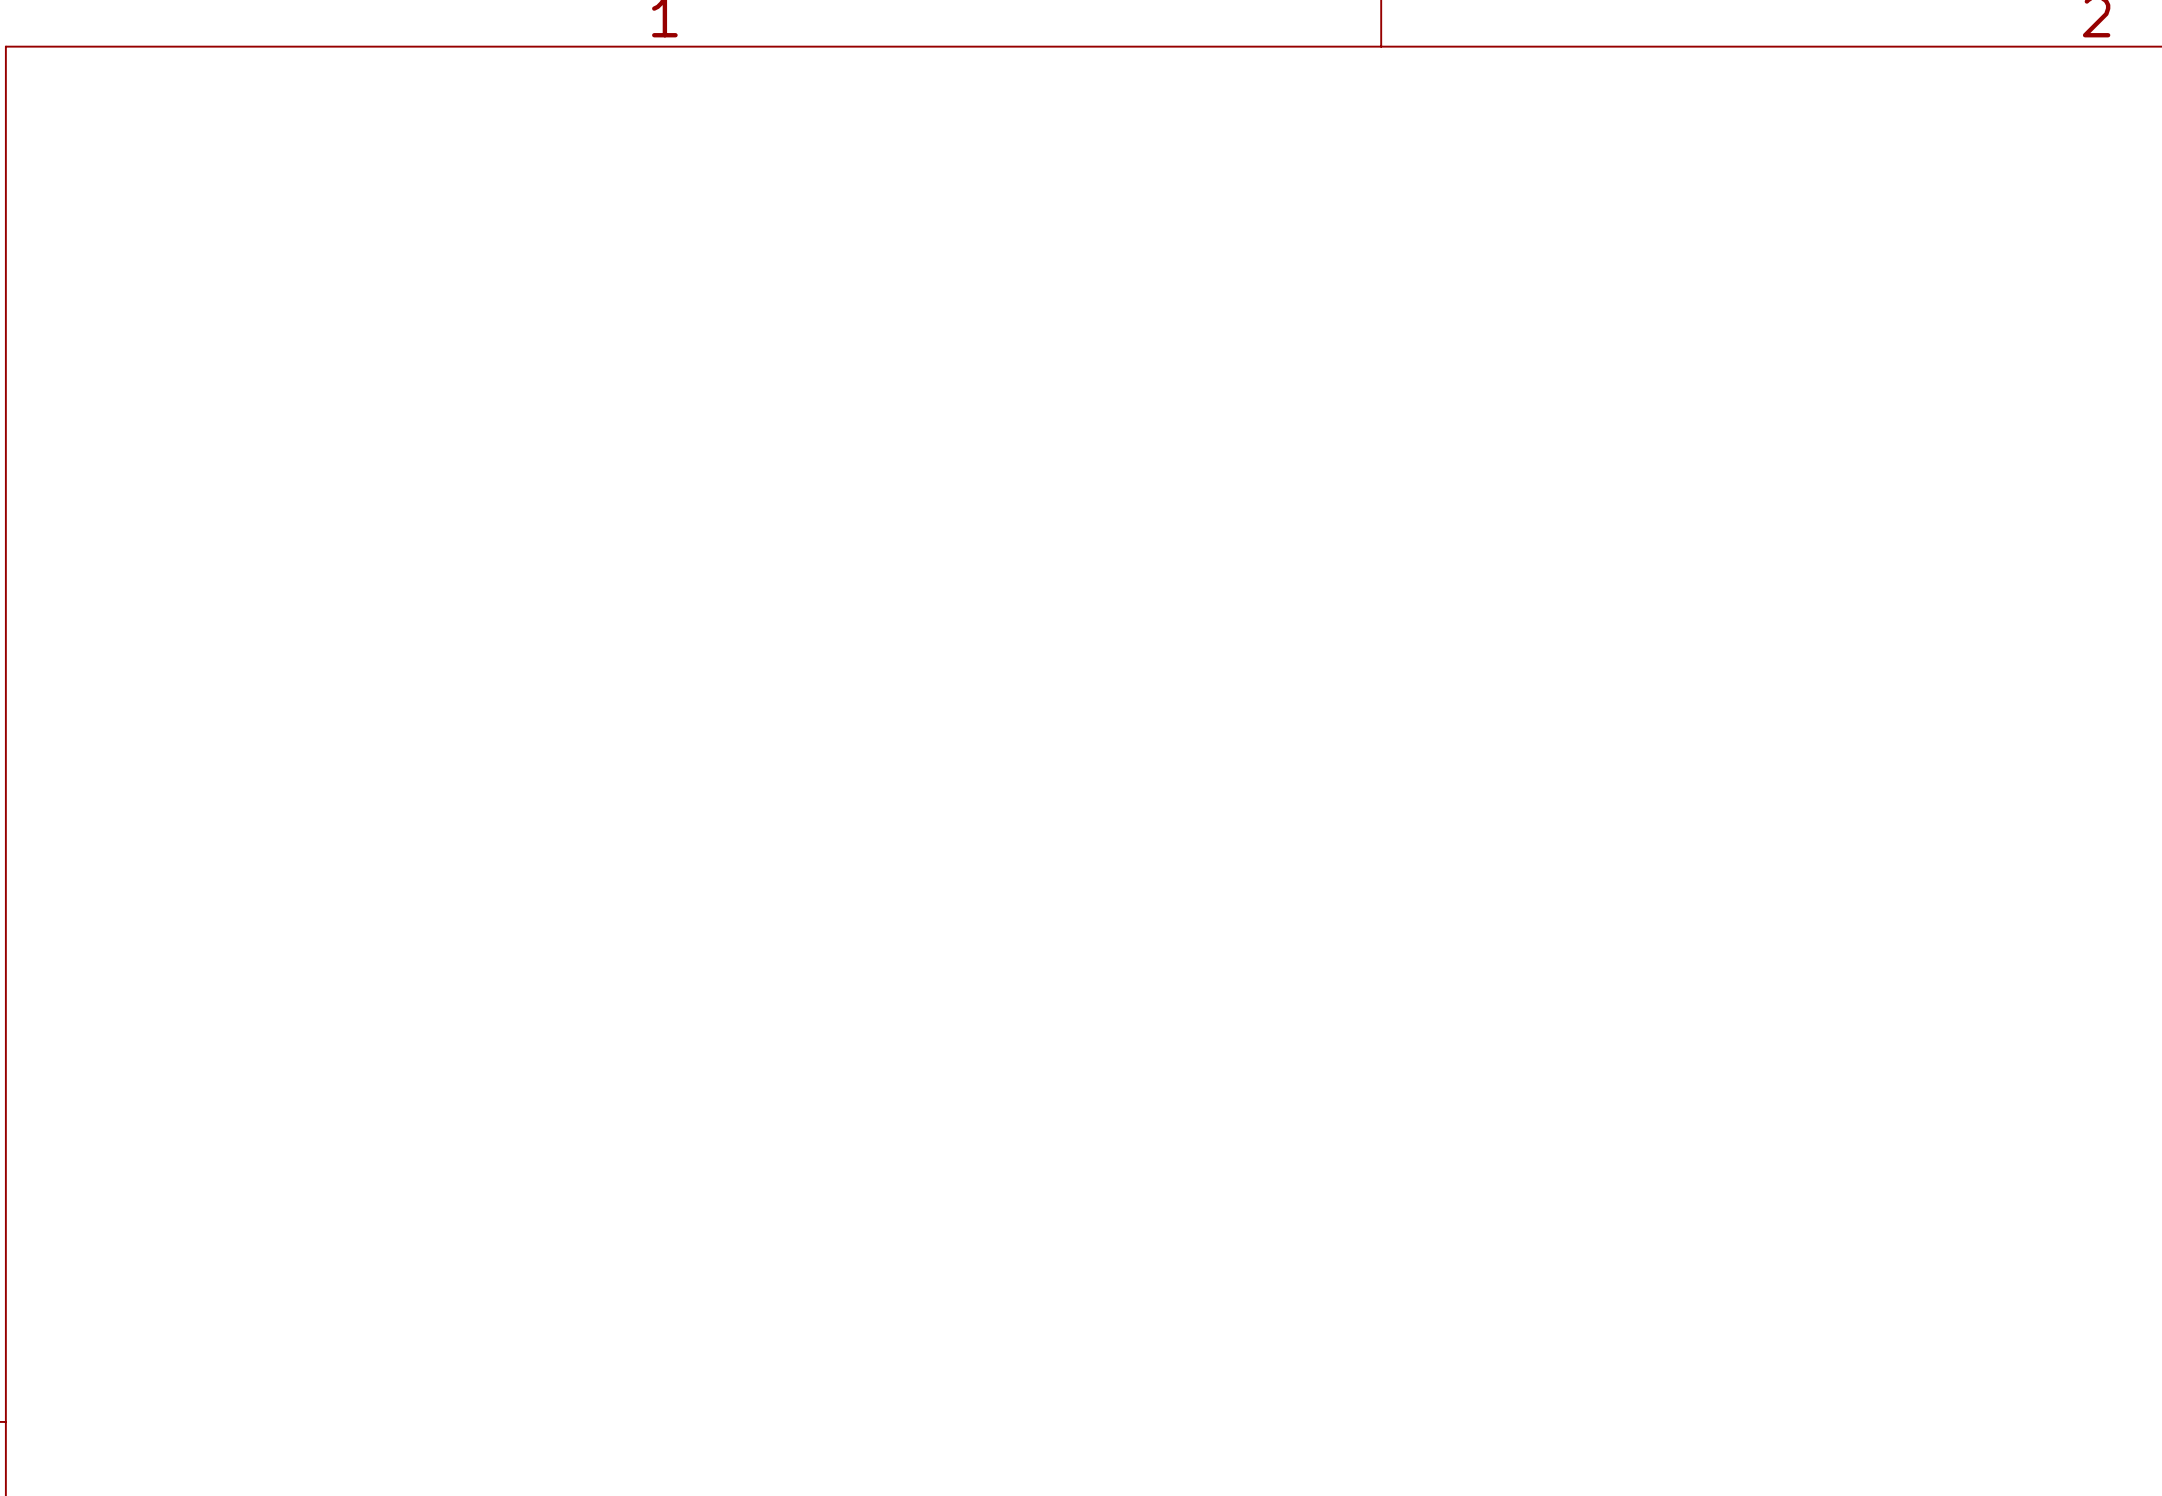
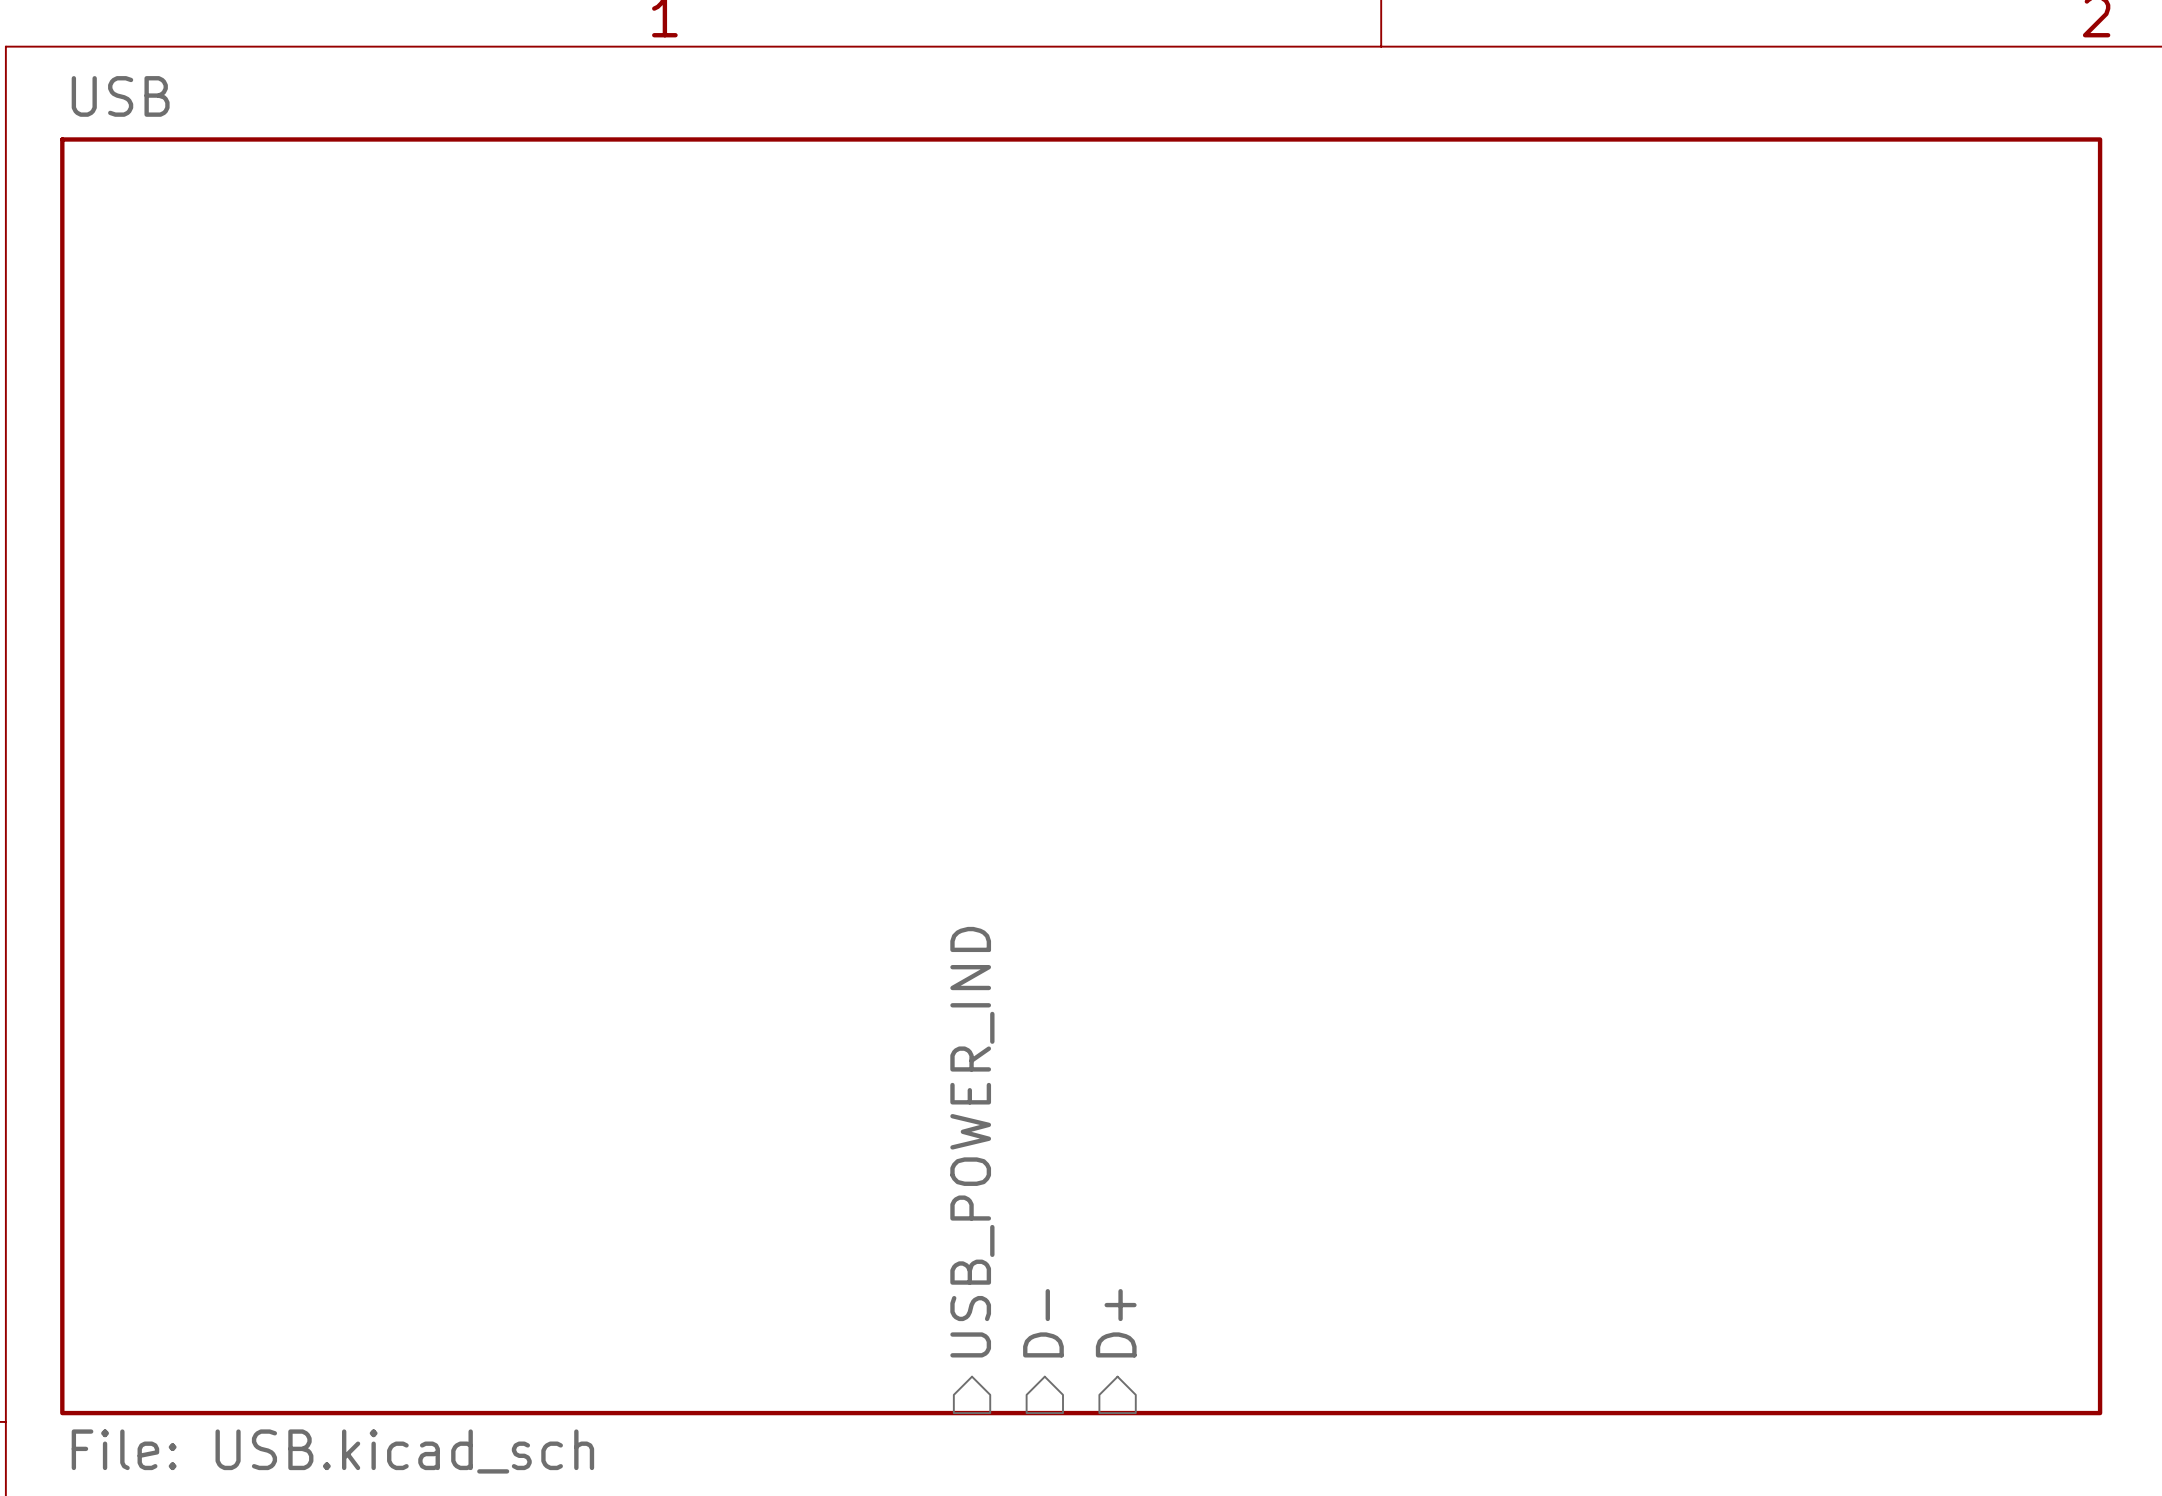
sheet USB: none -> File: USB.kicad_sch (1081, 776)
sheet pin: none -> USB_POWER_IND (972, 1142)
sheet pin: none -> D- (1043, 1323)
sheet pin: none -> D+ (1116, 1323)

